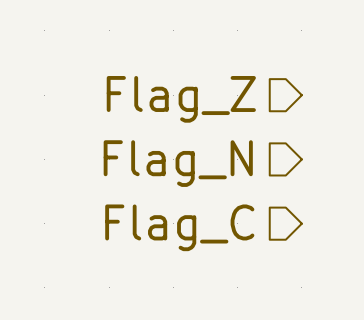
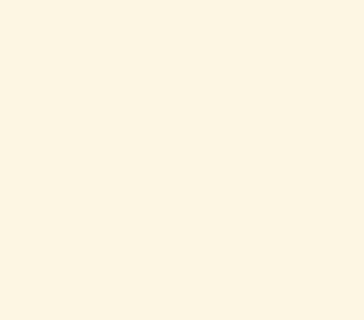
hierarchical label: Flag_Z (181, 99) -> none
hierarchical label: Flag_N (178, 163) -> none
hierarchical label: Flag_C (179, 227) -> none

